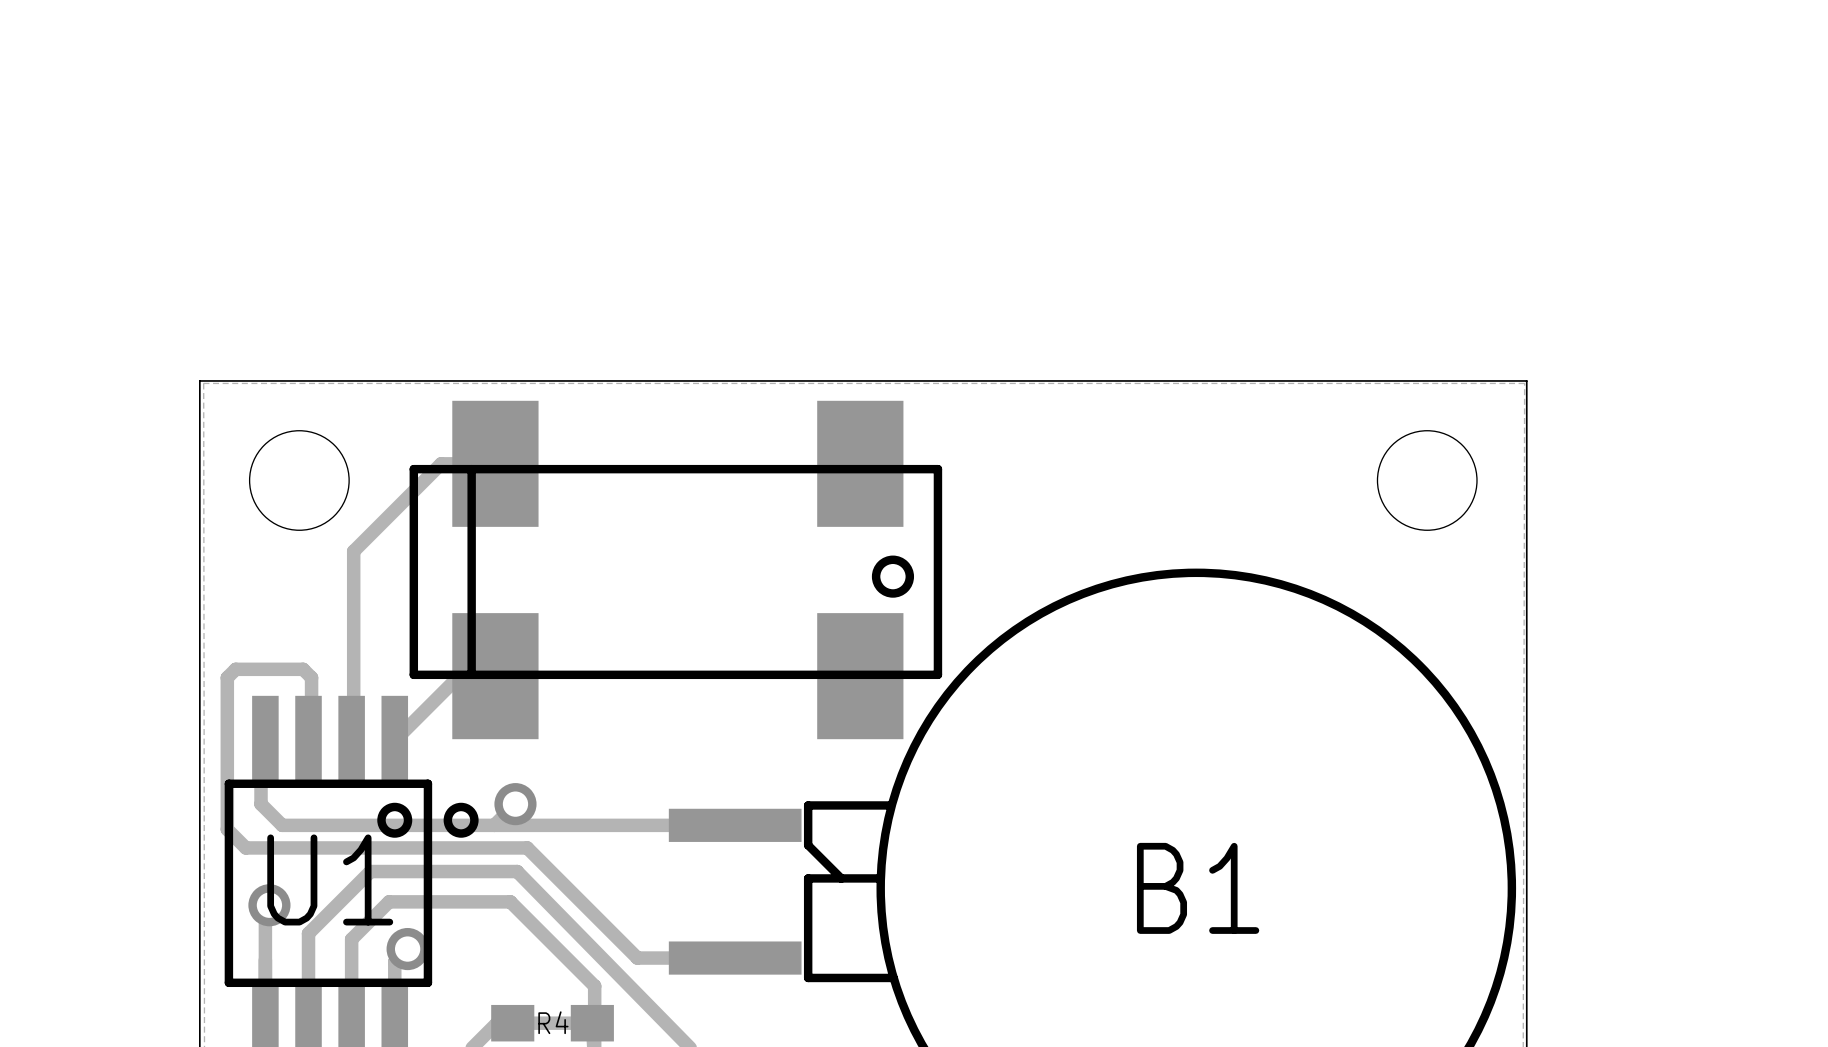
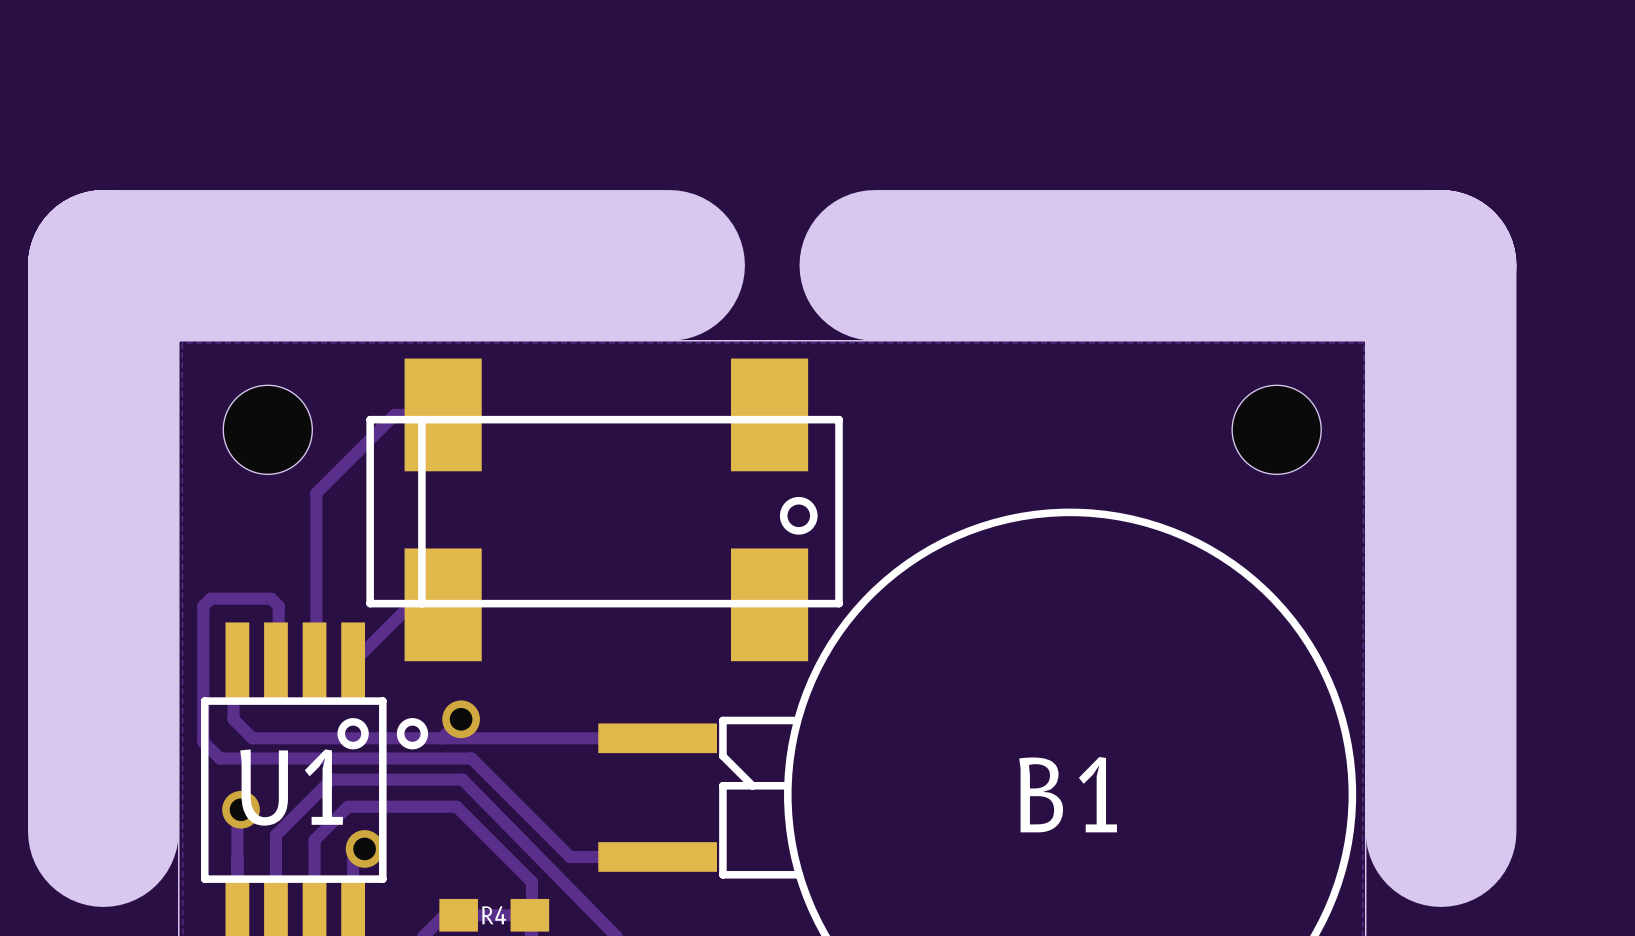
board edge: none -> (669, 265) (103, 265) (103, 831)
board edge: none -> (874, 265) (1441, 265) (1441, 831)

